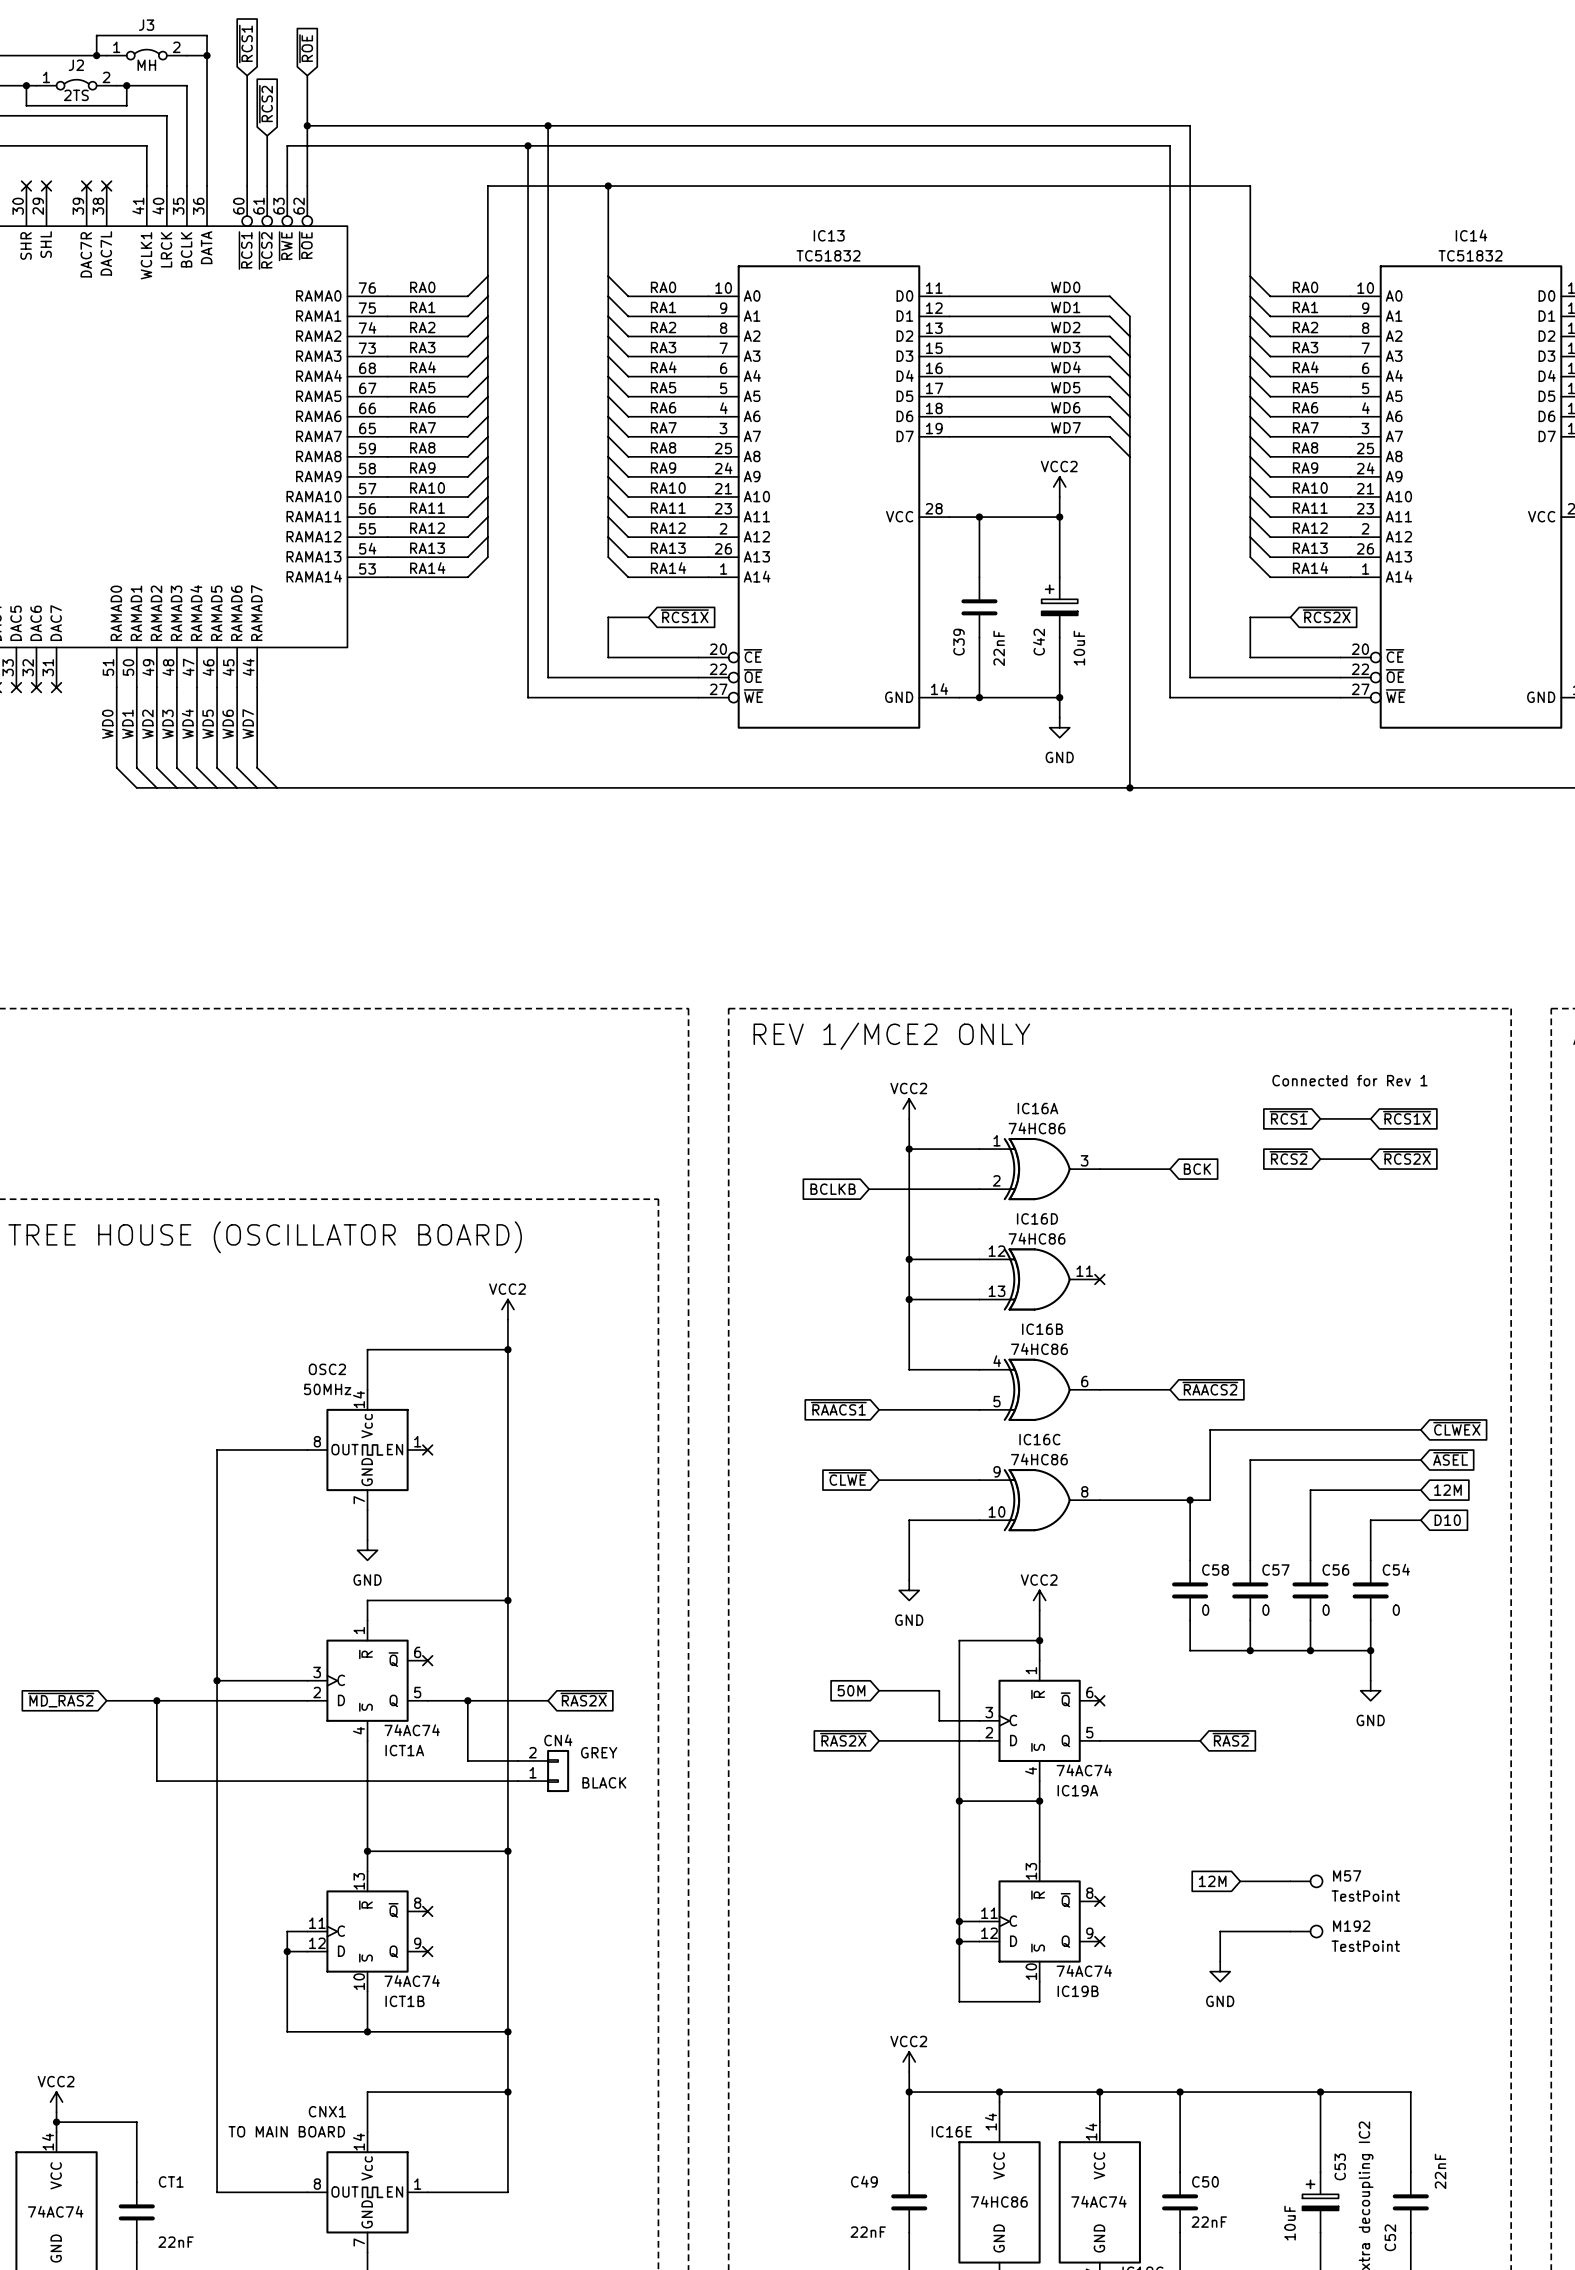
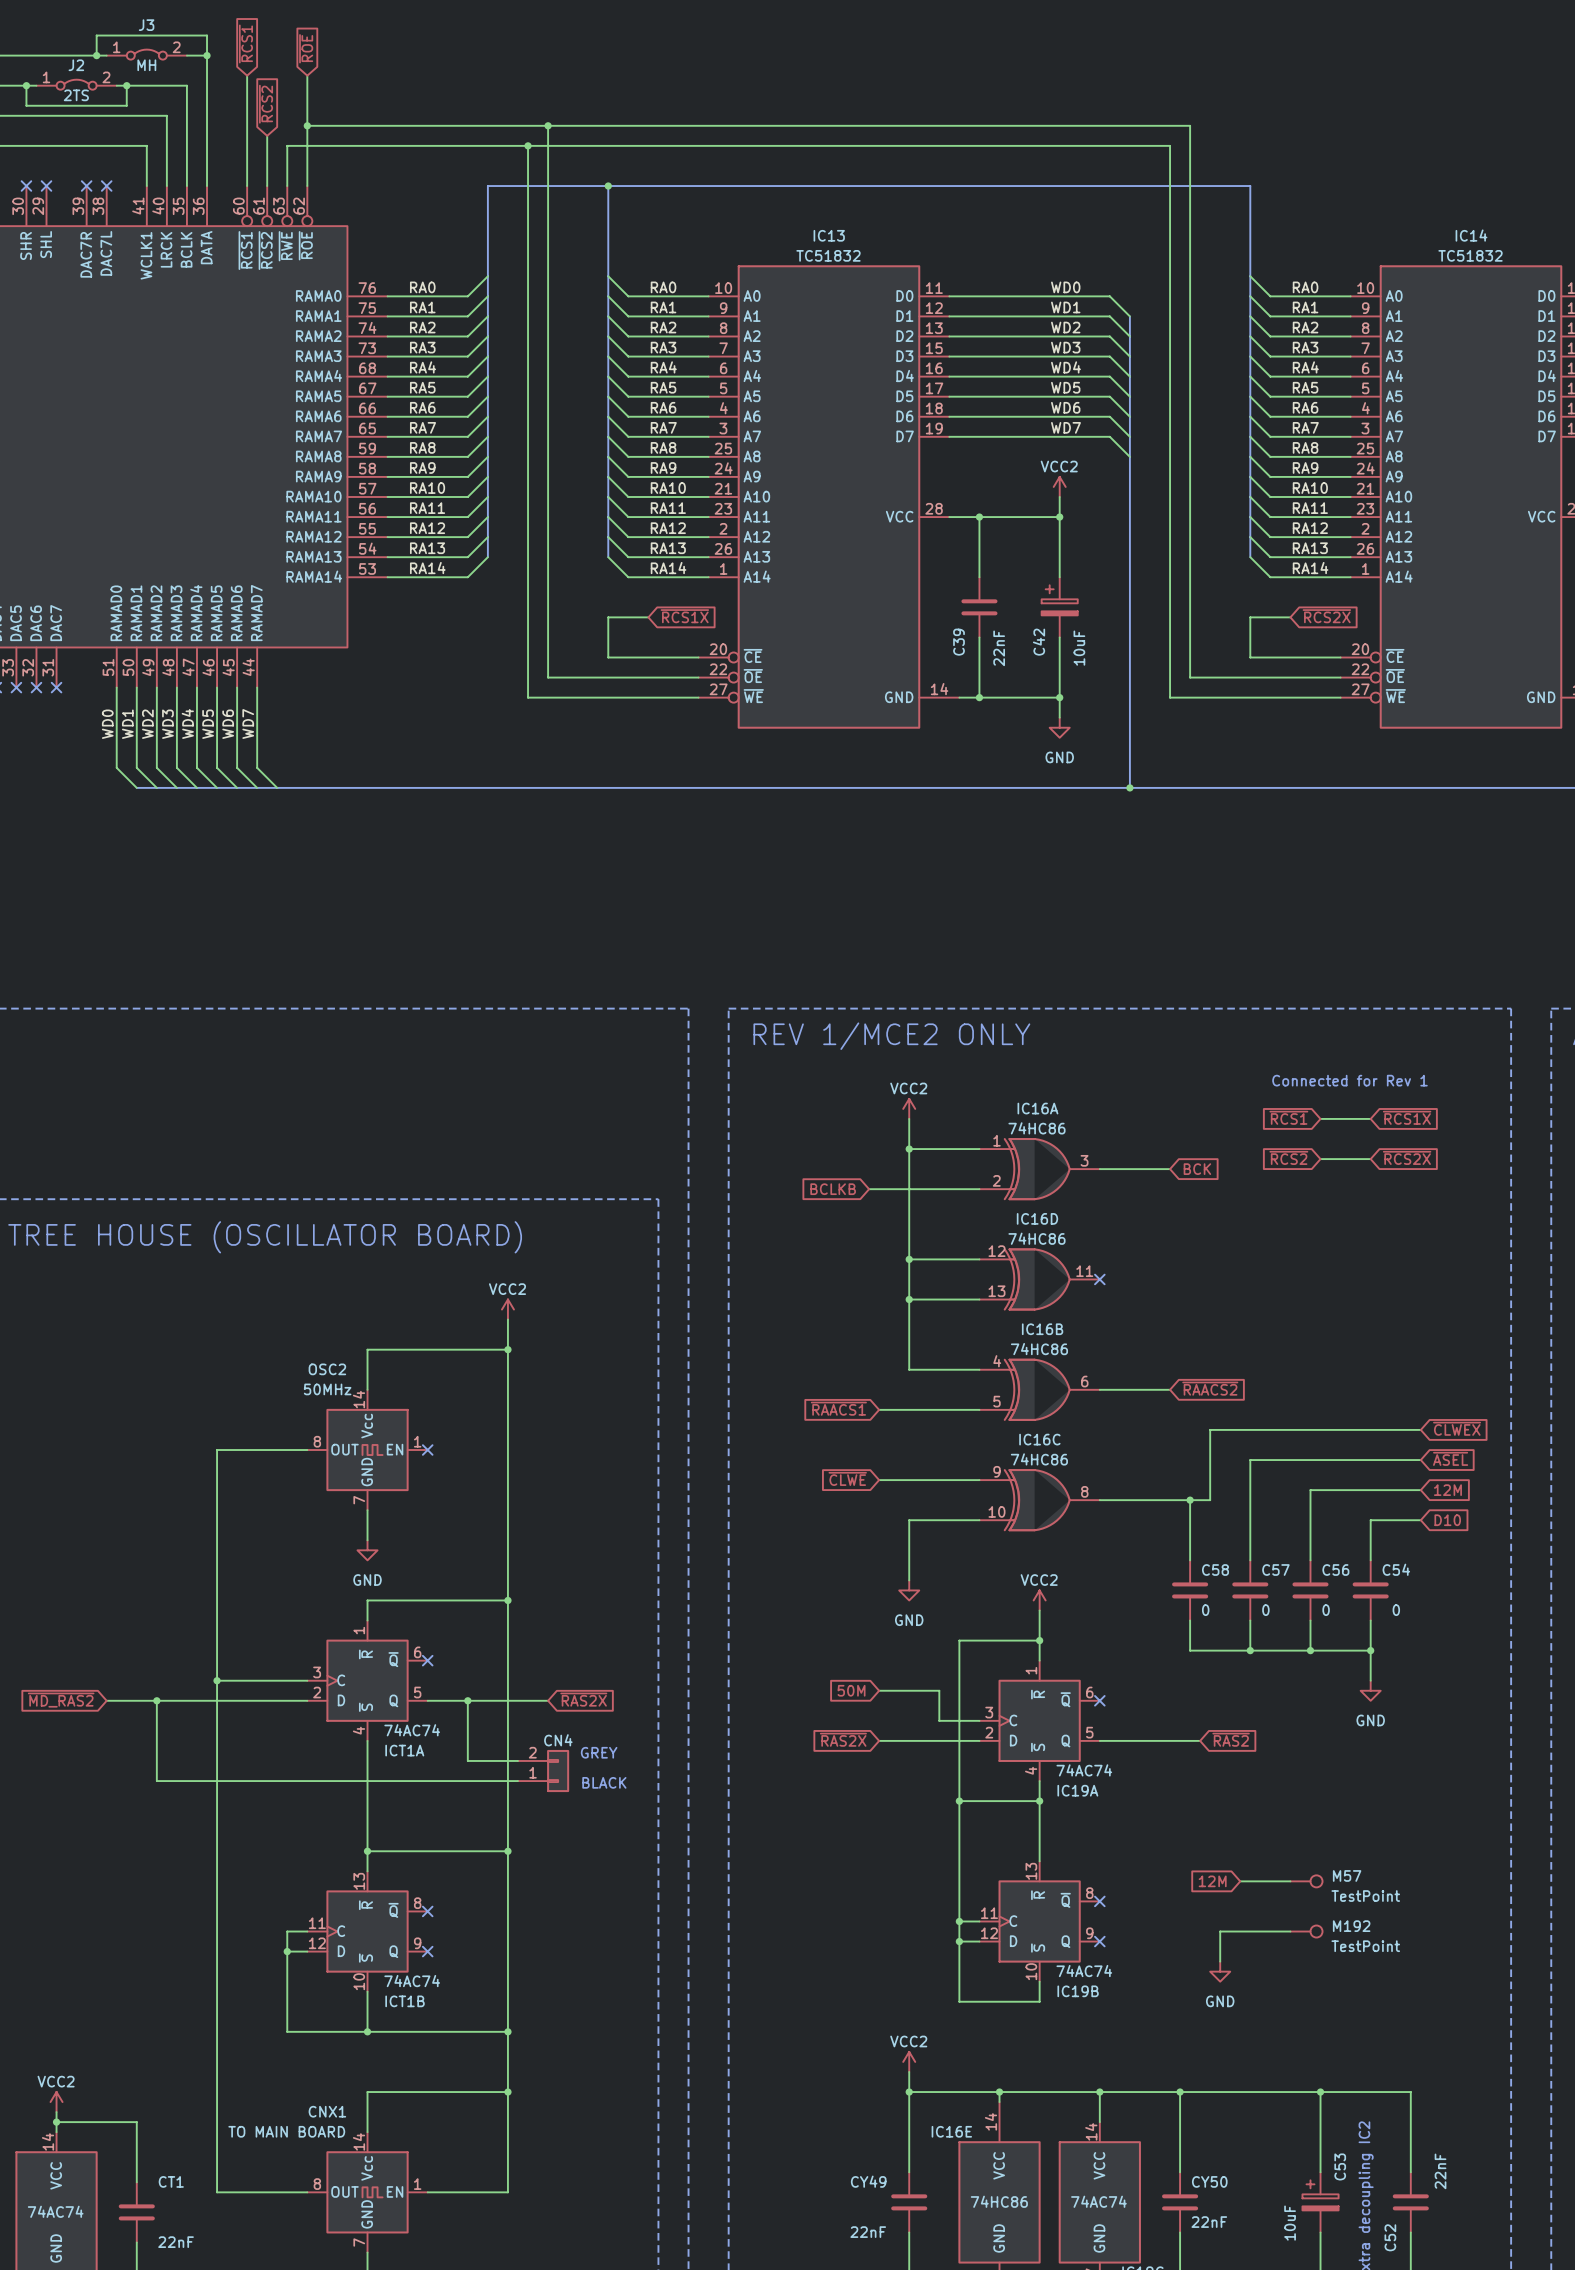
C49 name: C49 (864, 2181) -> CY49 (868, 2181)
C50 name: C50 (1205, 2181) -> CY50 (1209, 2181)

